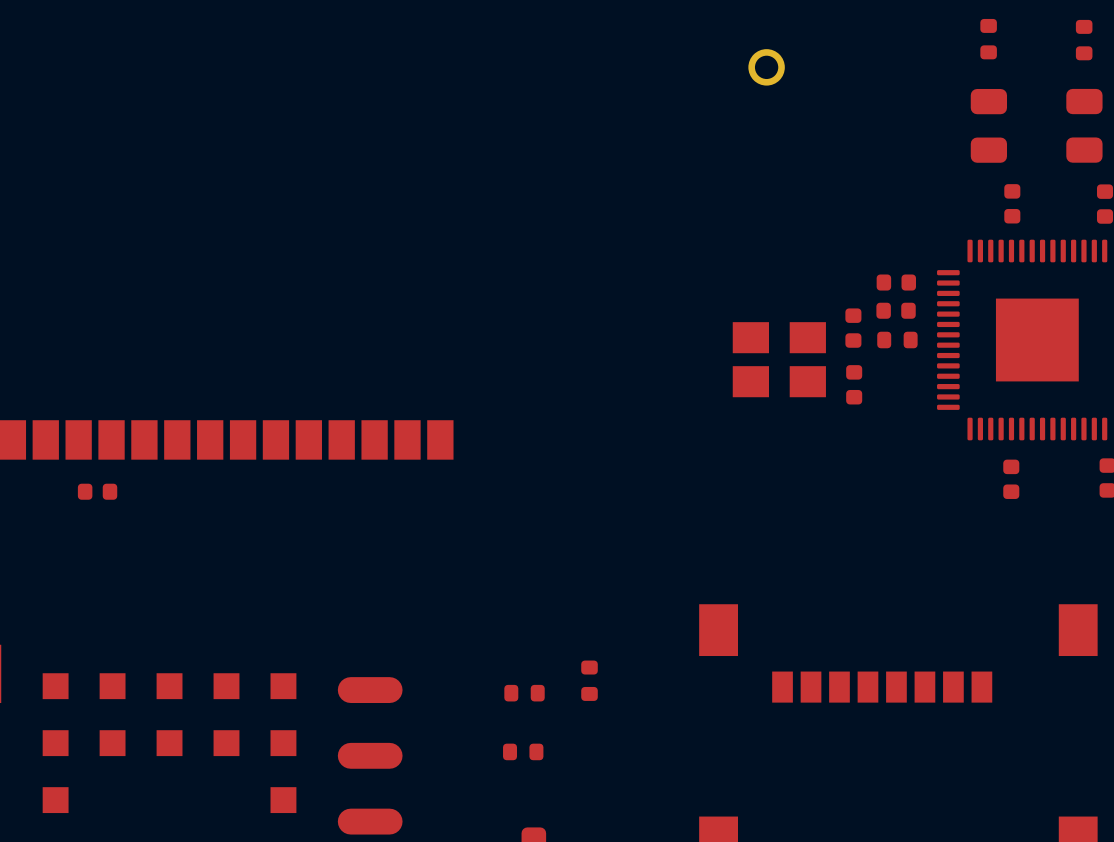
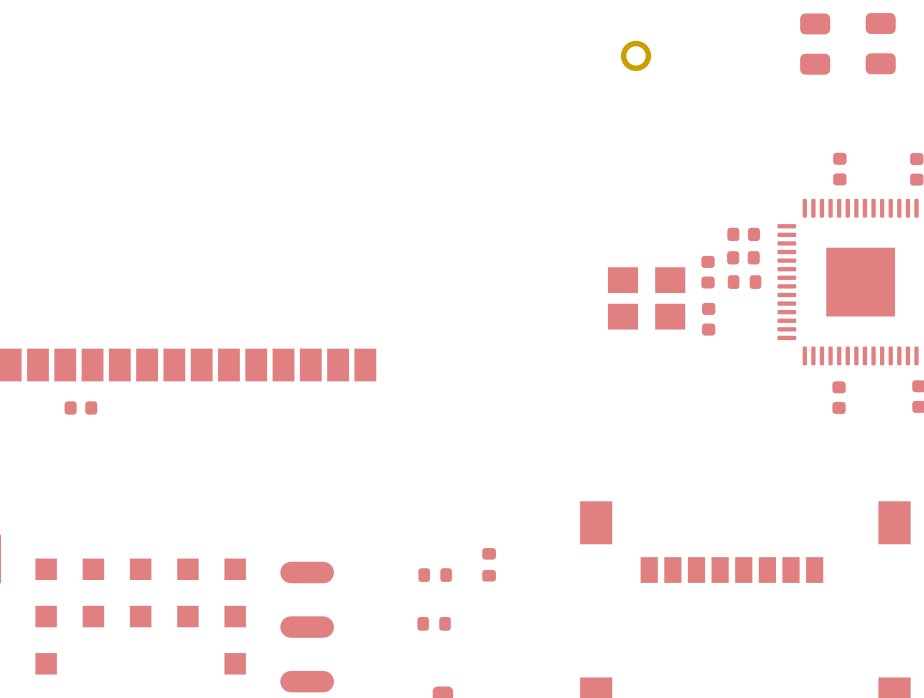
part footprint: [980, 18, 997, 60] -> [800, 13, 831, 75]
part: (1084, 40) -> none
part: none -> (880, 43)
part: (988, 125) -> none
part: (1084, 125) -> none

